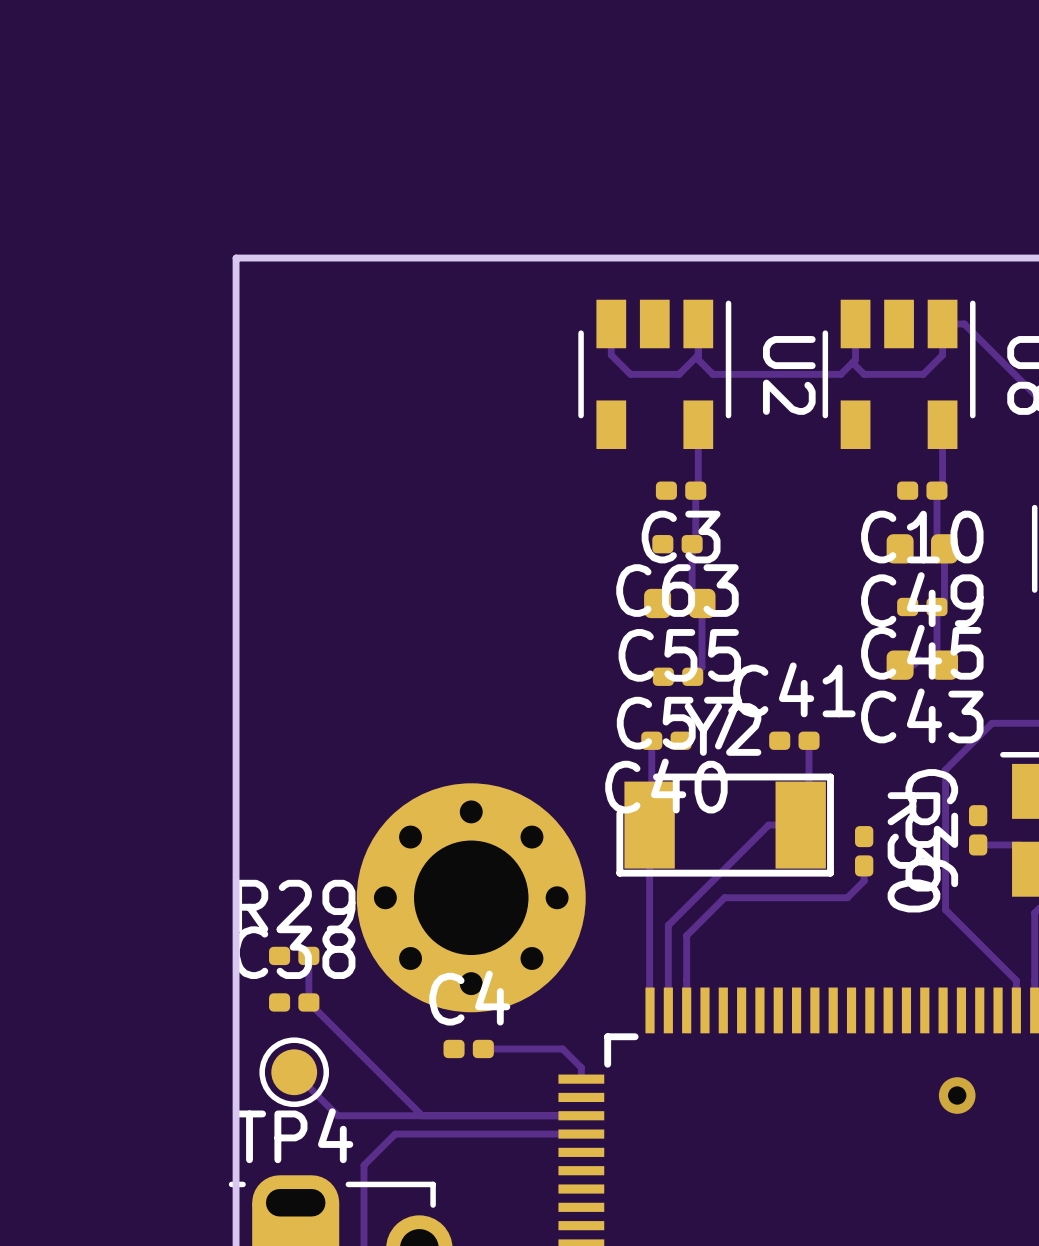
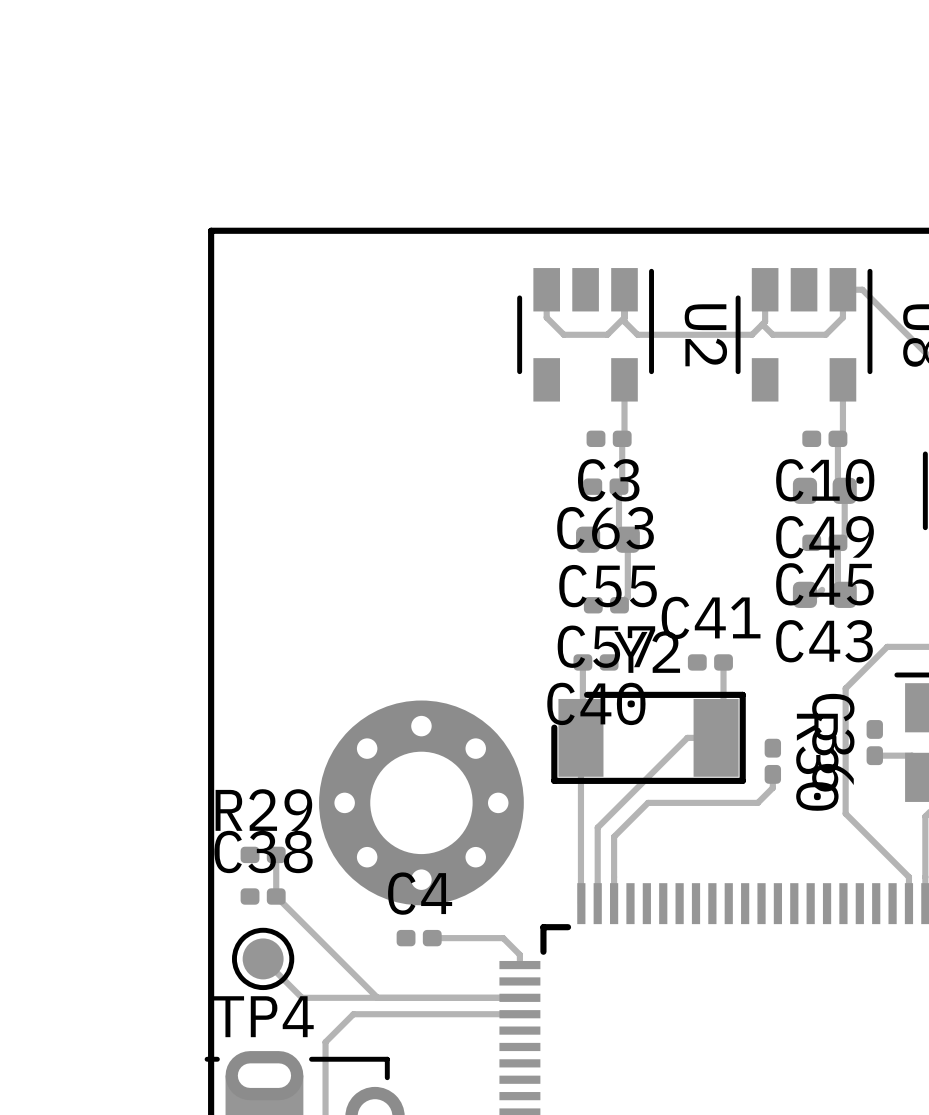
via: (957, 1095) -> none

